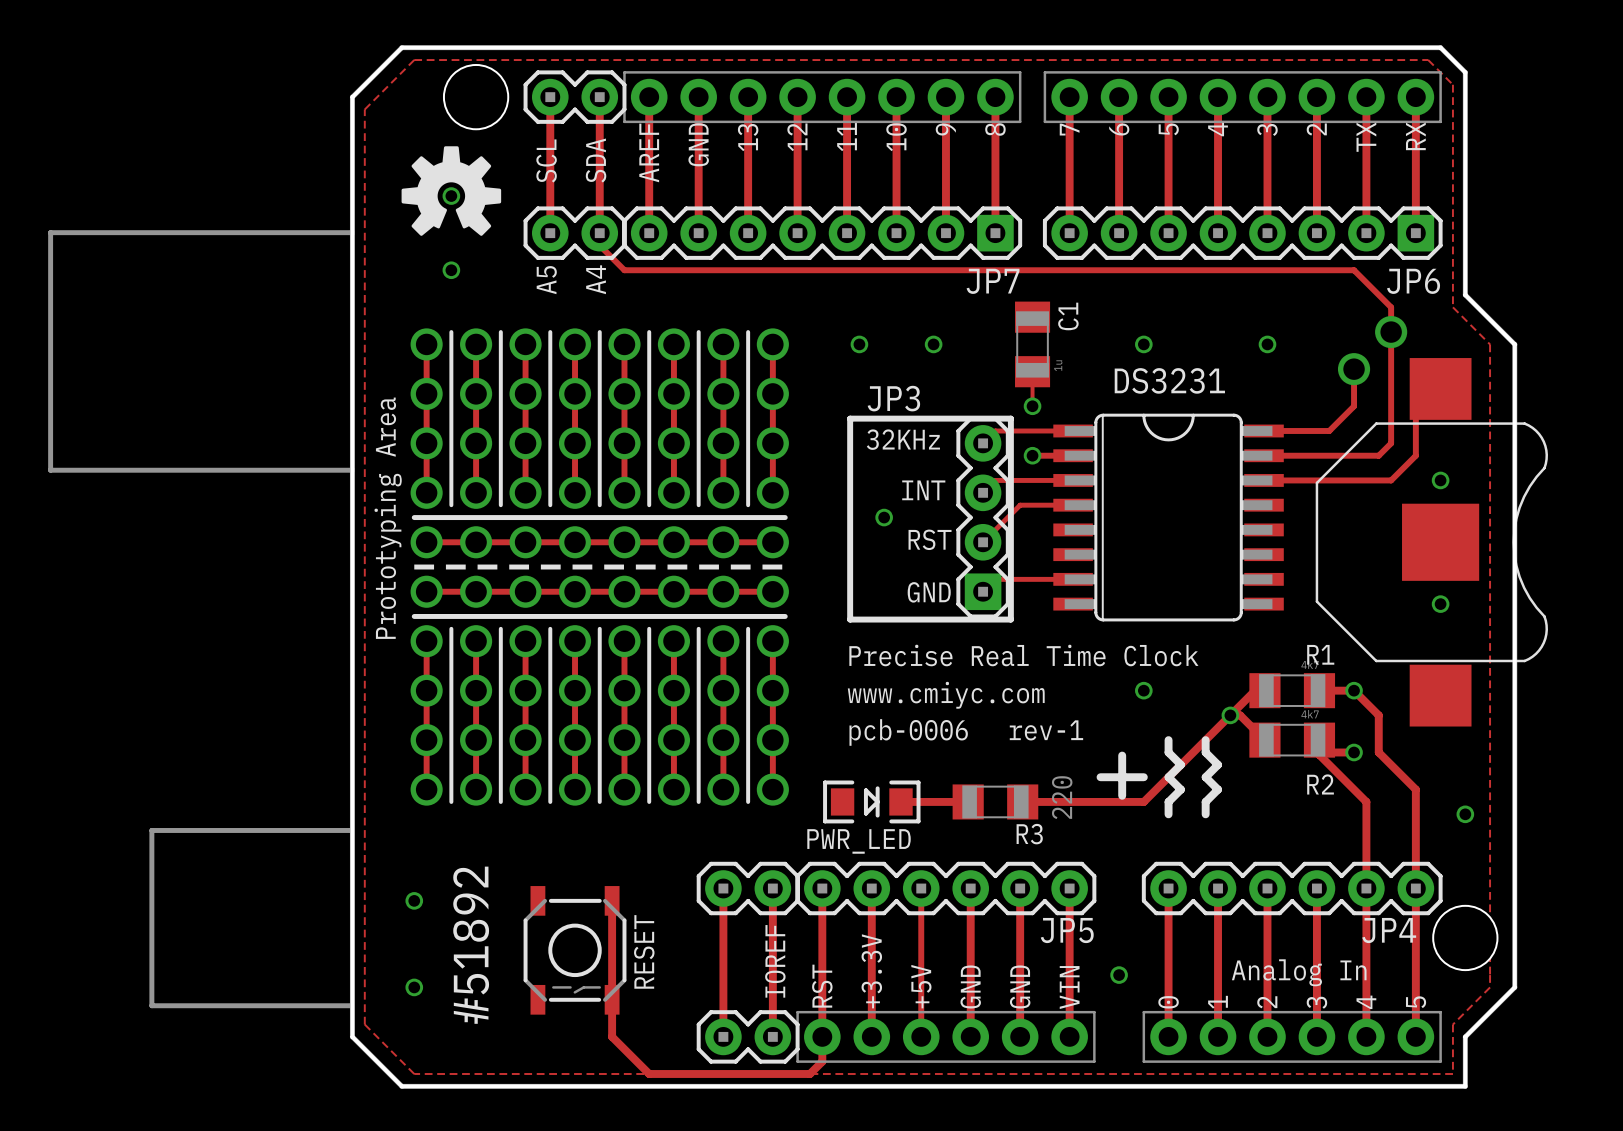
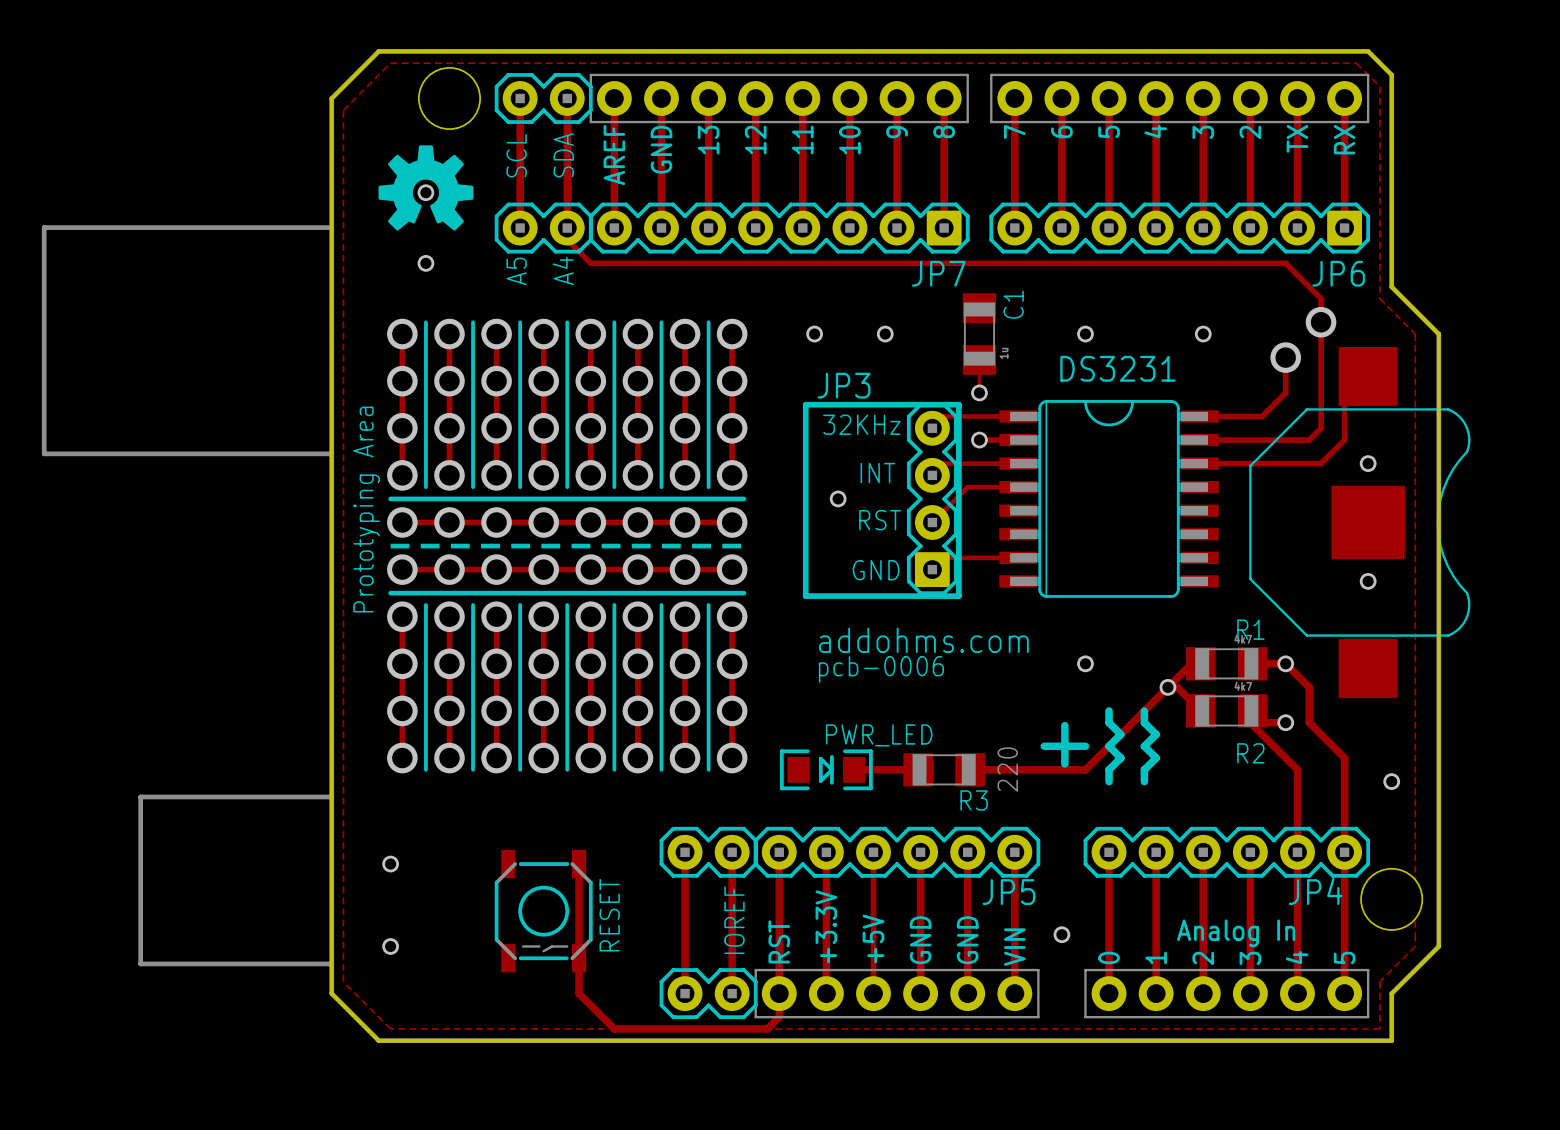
text: Precise Real Time Clock (1023, 655) -> none
text: none -> addohms.com (923, 640)
text: www.cmiyc.com (946, 695) -> pcb-0006 (881, 669)
text: rev-1 (1046, 730) -> none
text: pcb-0006 (908, 732) -> none
PWR_LED name position: PWR_LED (859, 841) -> PWR_LED (879, 735)
text: #51892 (471, 945) -> none

